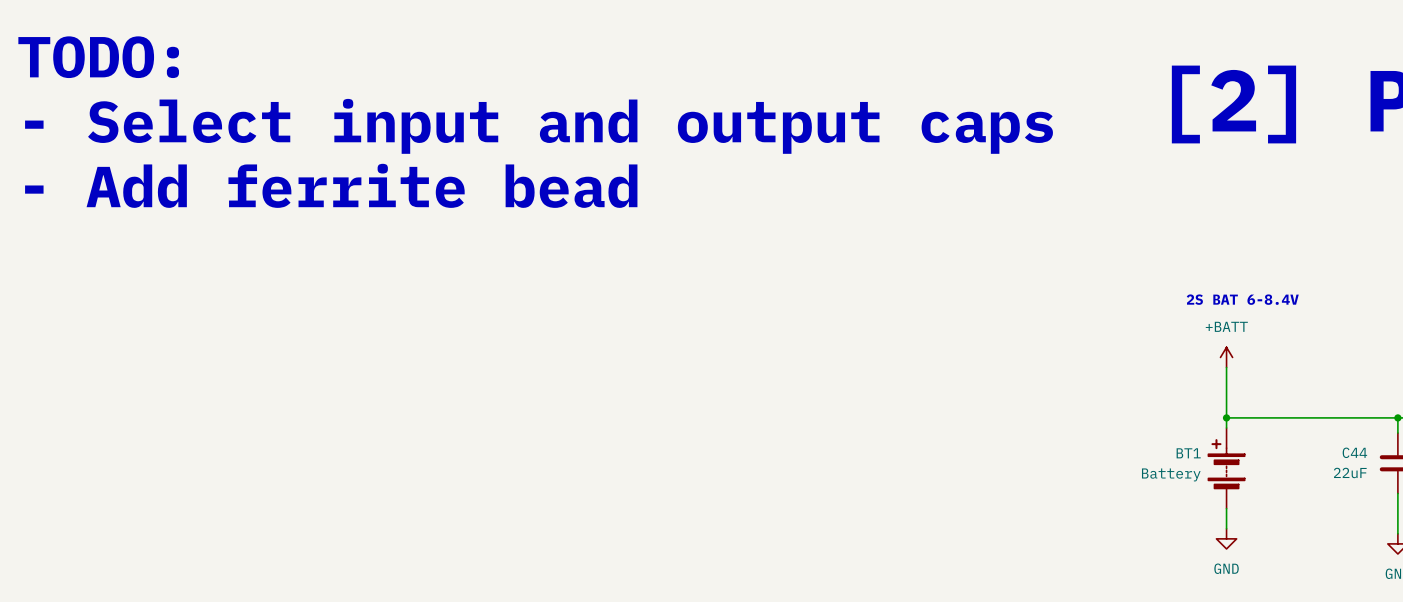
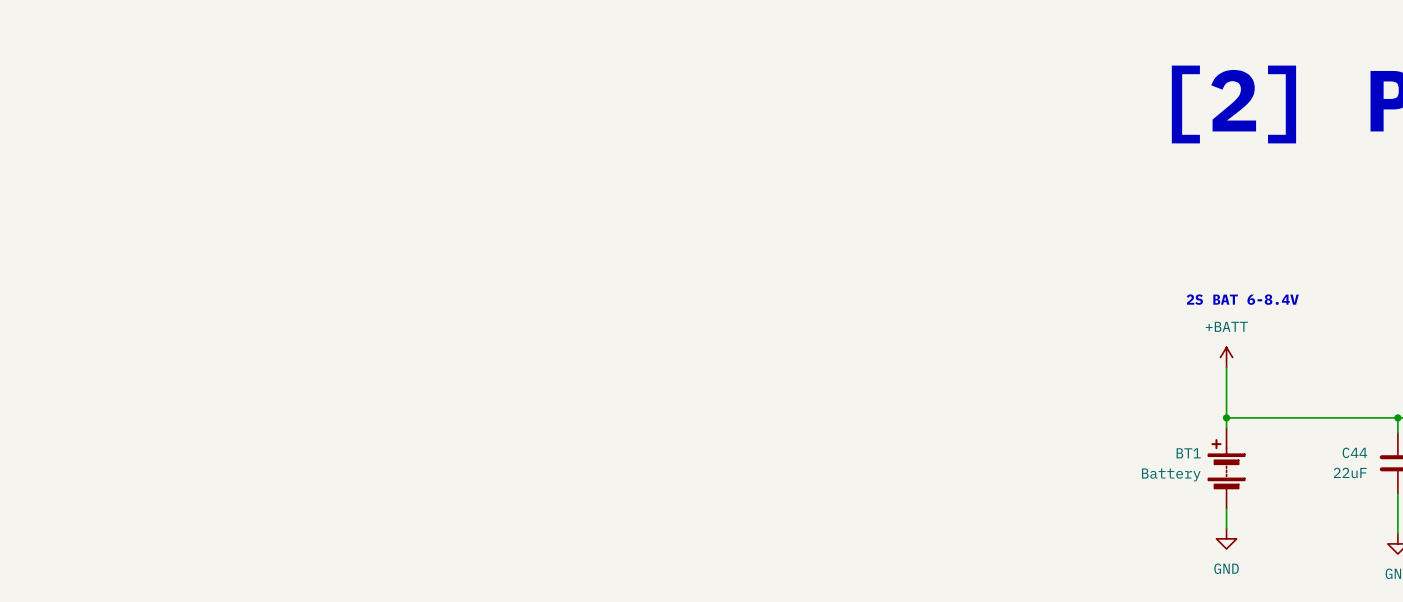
text: TODO: (98, 57) -> none
text: - Select input and output caps (539, 126) -> none
text: - Add ferrite bead (331, 185) -> none

